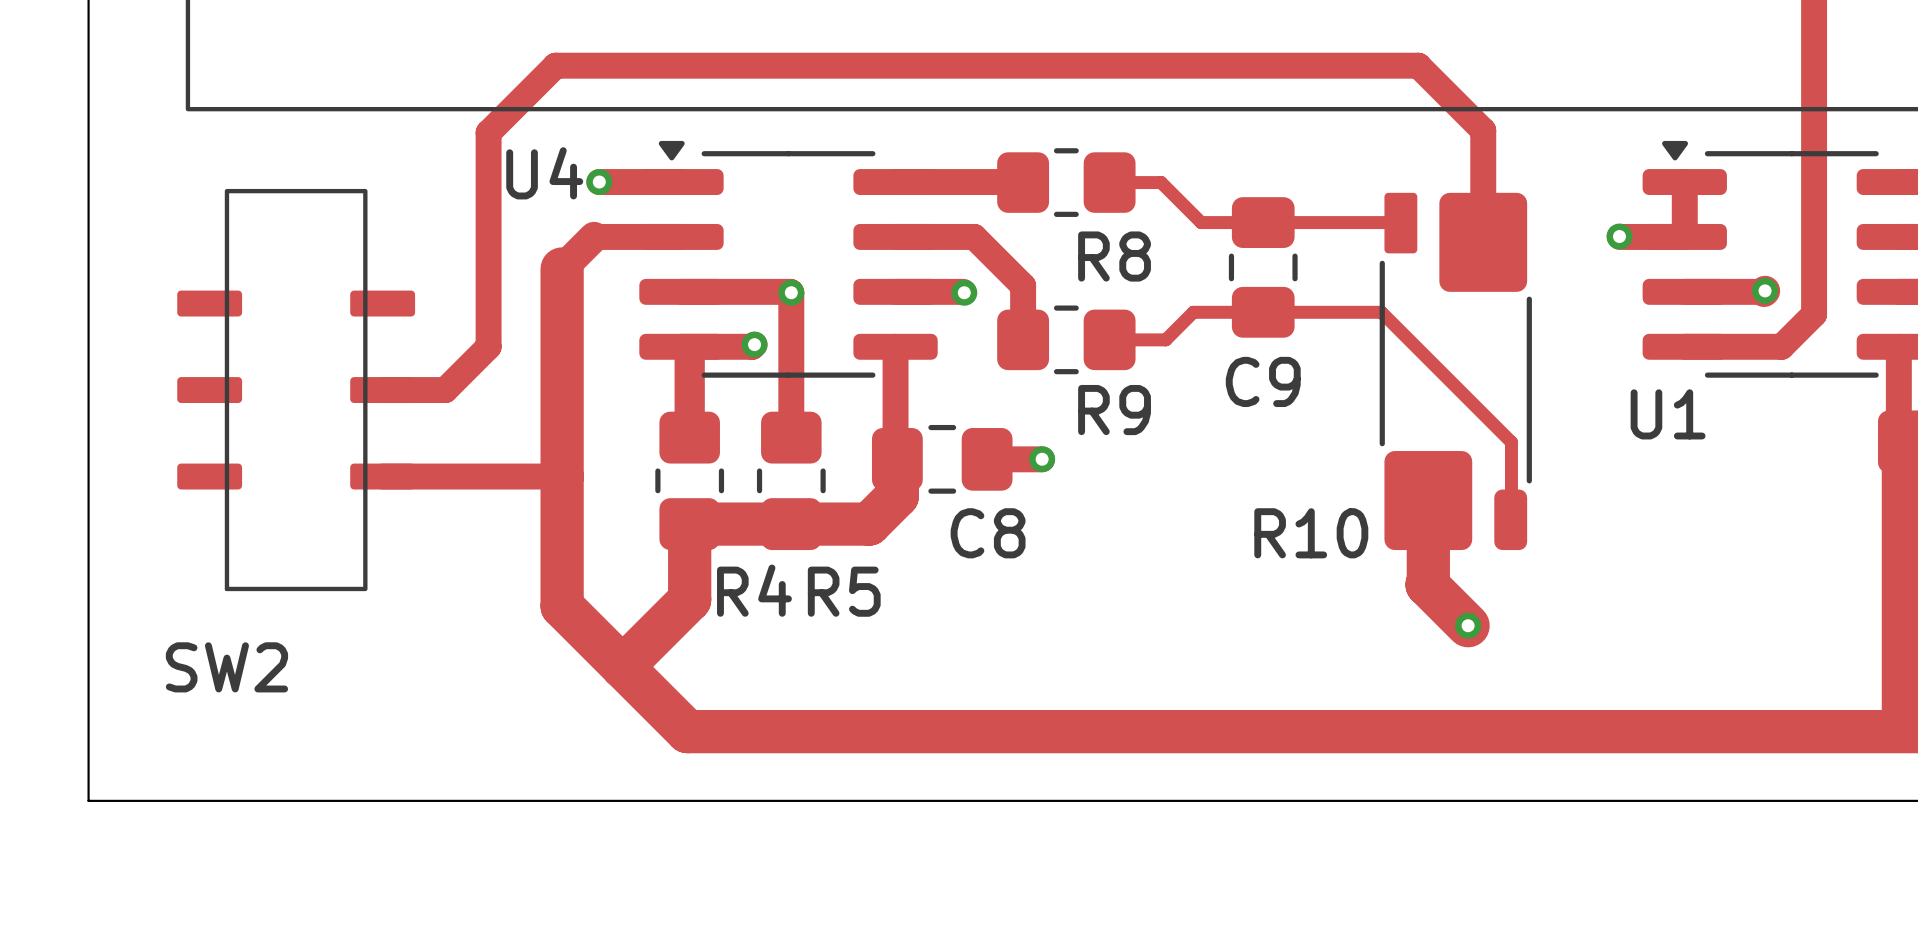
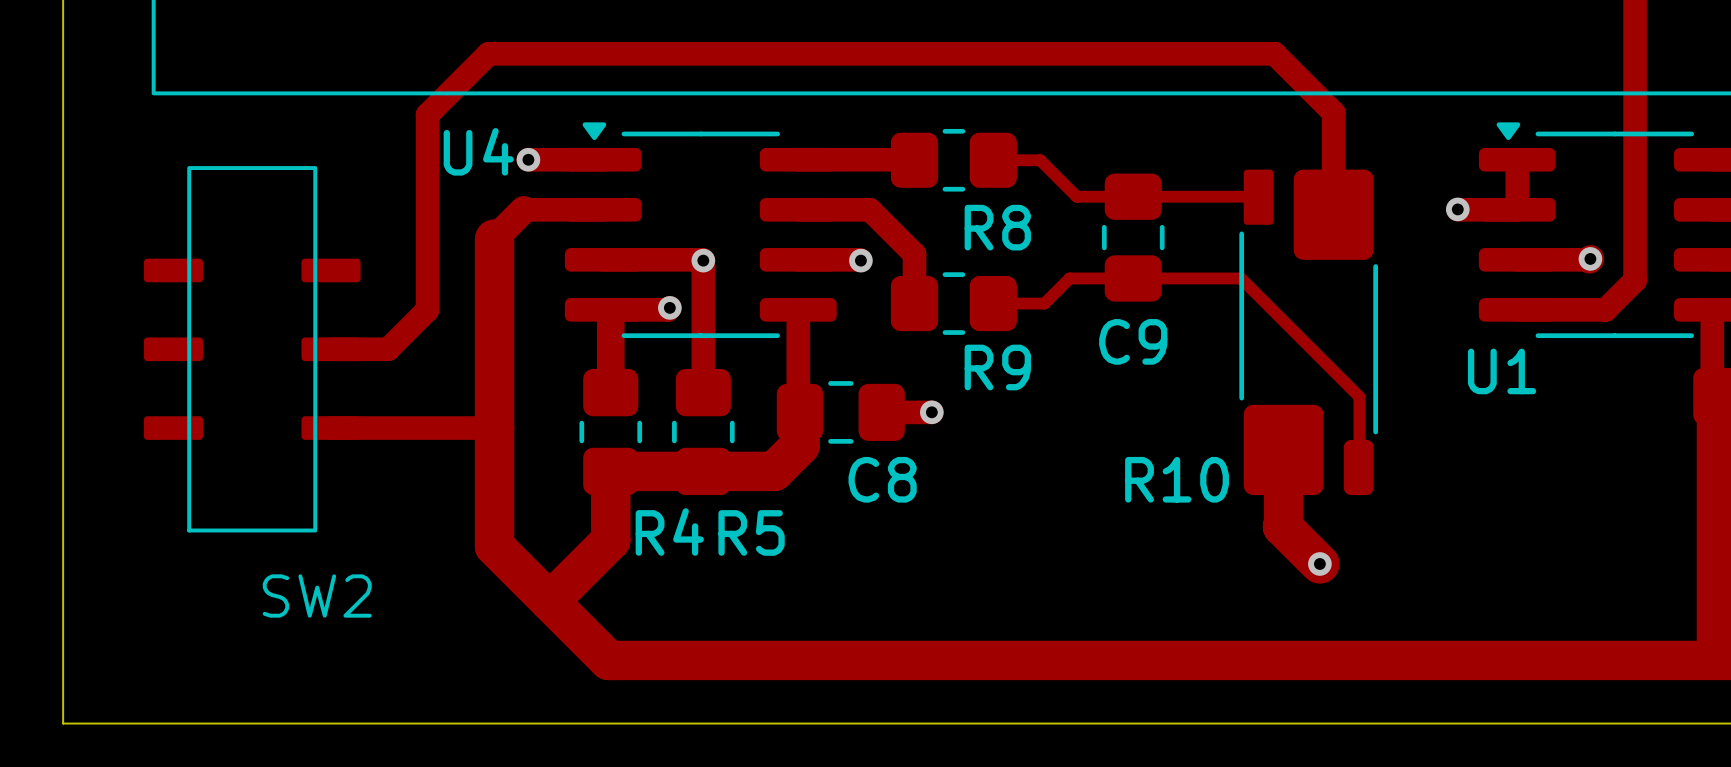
SW2 name position: SW2 (226, 667) -> SW2 (317, 596)

